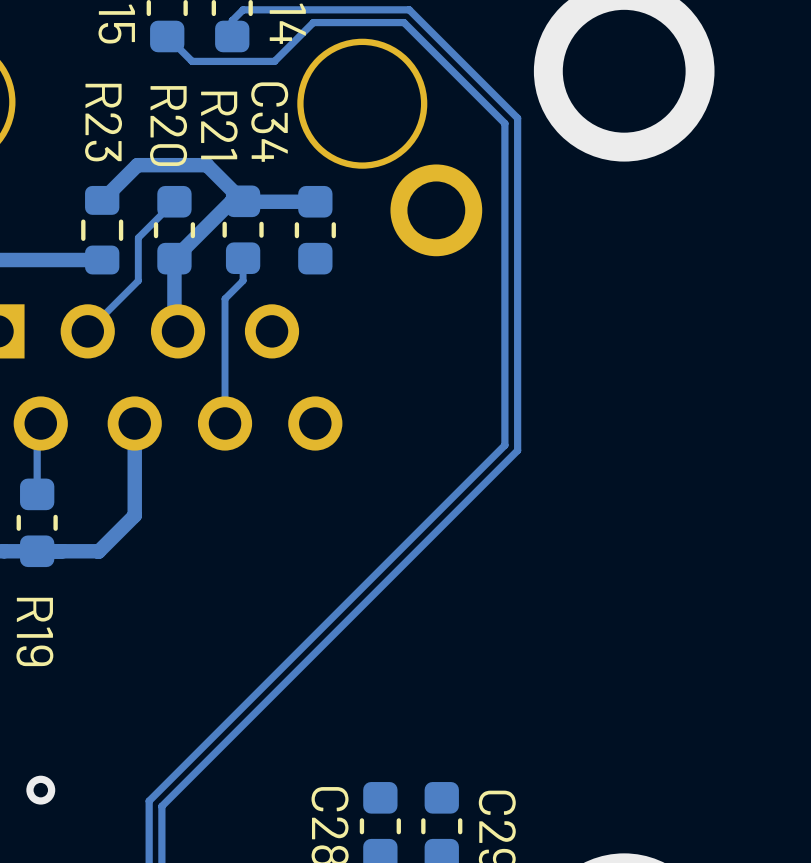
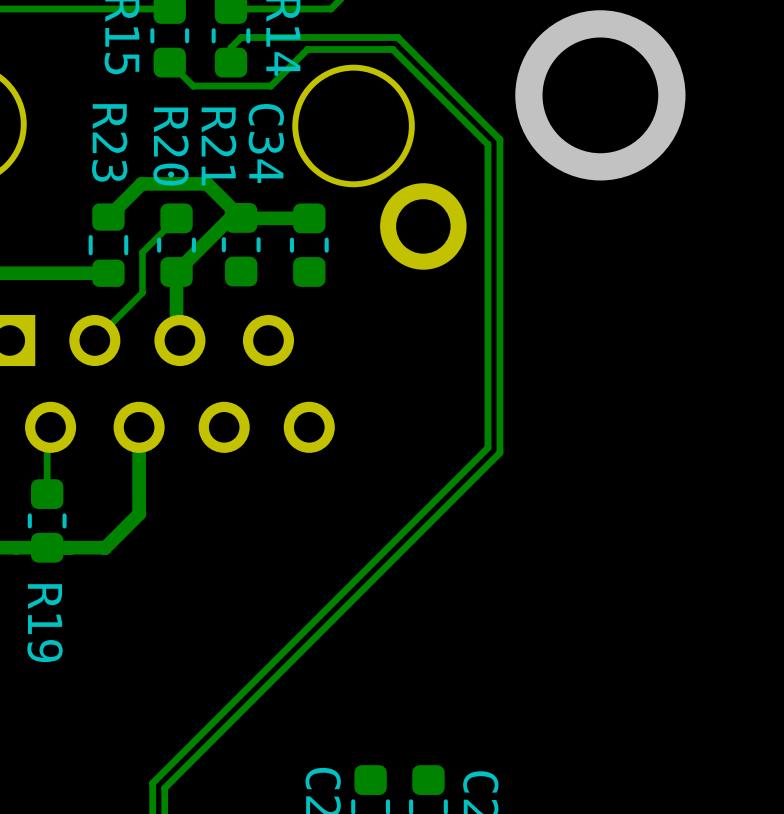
track: (243, 258) (243, 280) (225, 298) (225, 423) -> none
via: (40, 790) -> none

